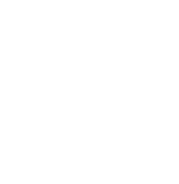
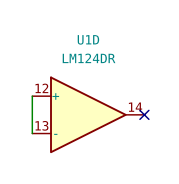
wire: none -> (32, 96) (32, 133)
U1D: none -> LM124DR (88, 114)
no-connect mark: none -> (144, 114)

